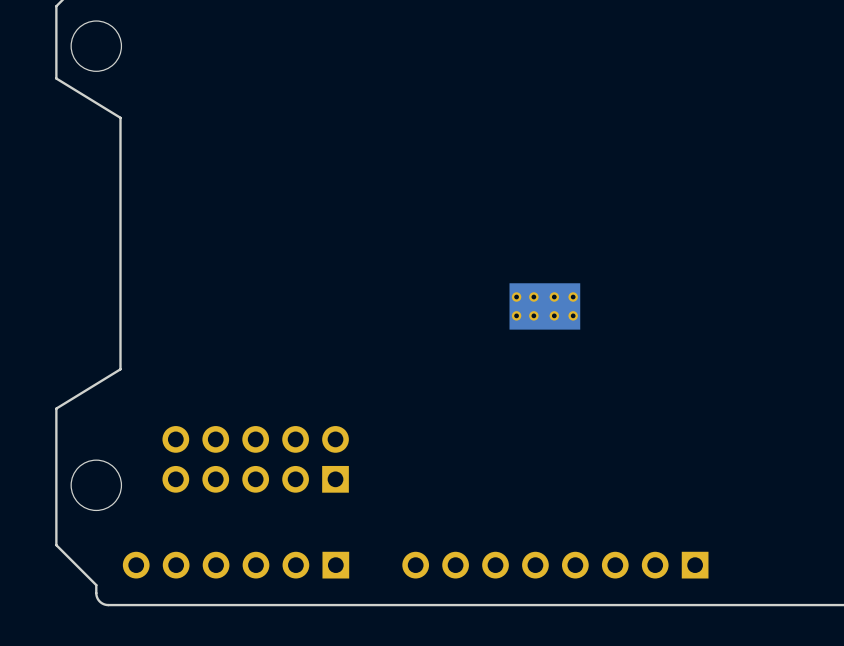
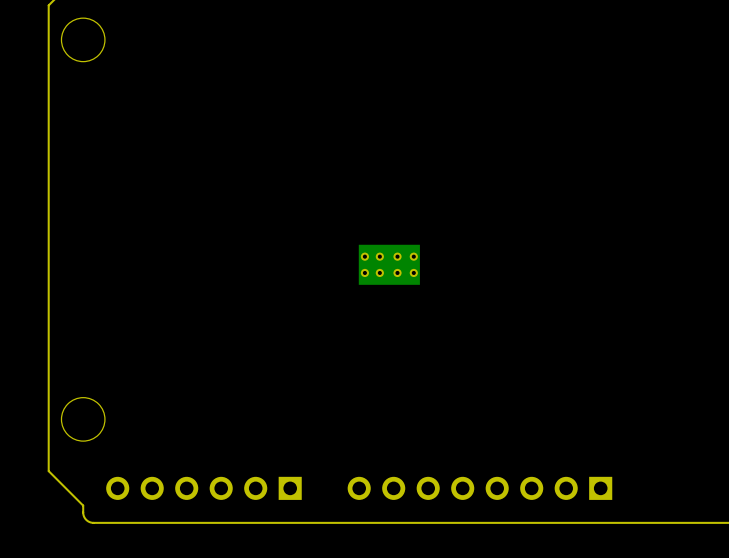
board edge: (56, 78) (120, 117) (120, 369) (56, 408) -> (48, 67) (48, 353)
part position: (544, 306) -> (389, 264)
part: (255, 459) -> none

